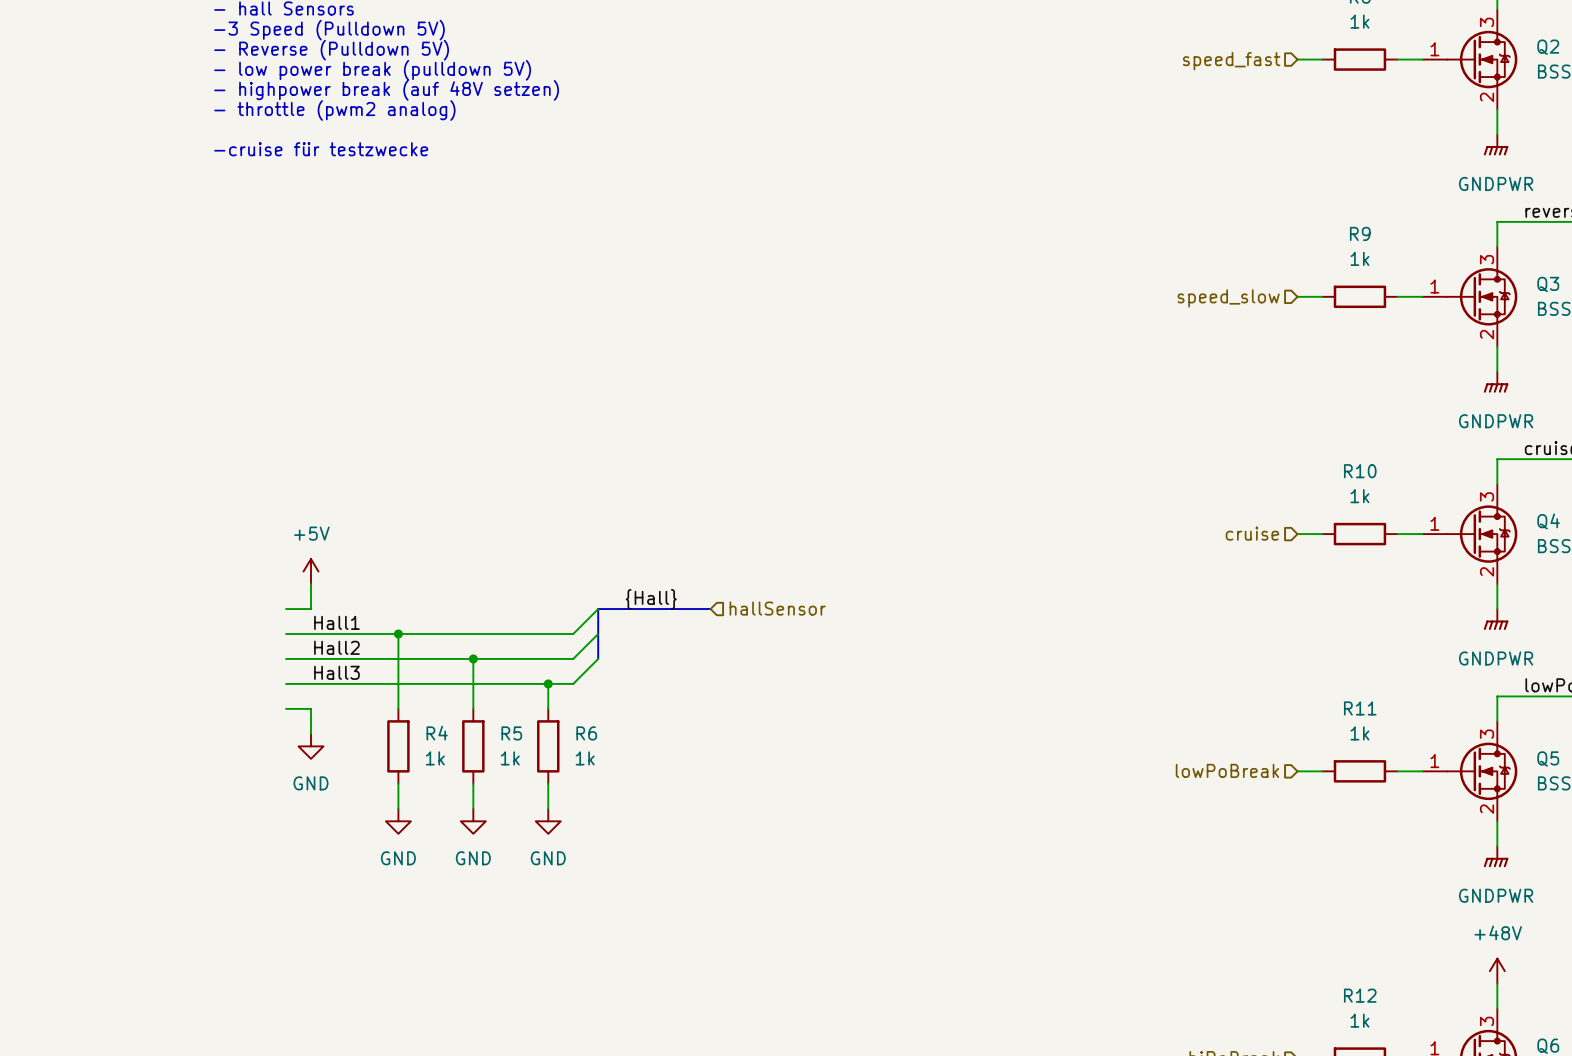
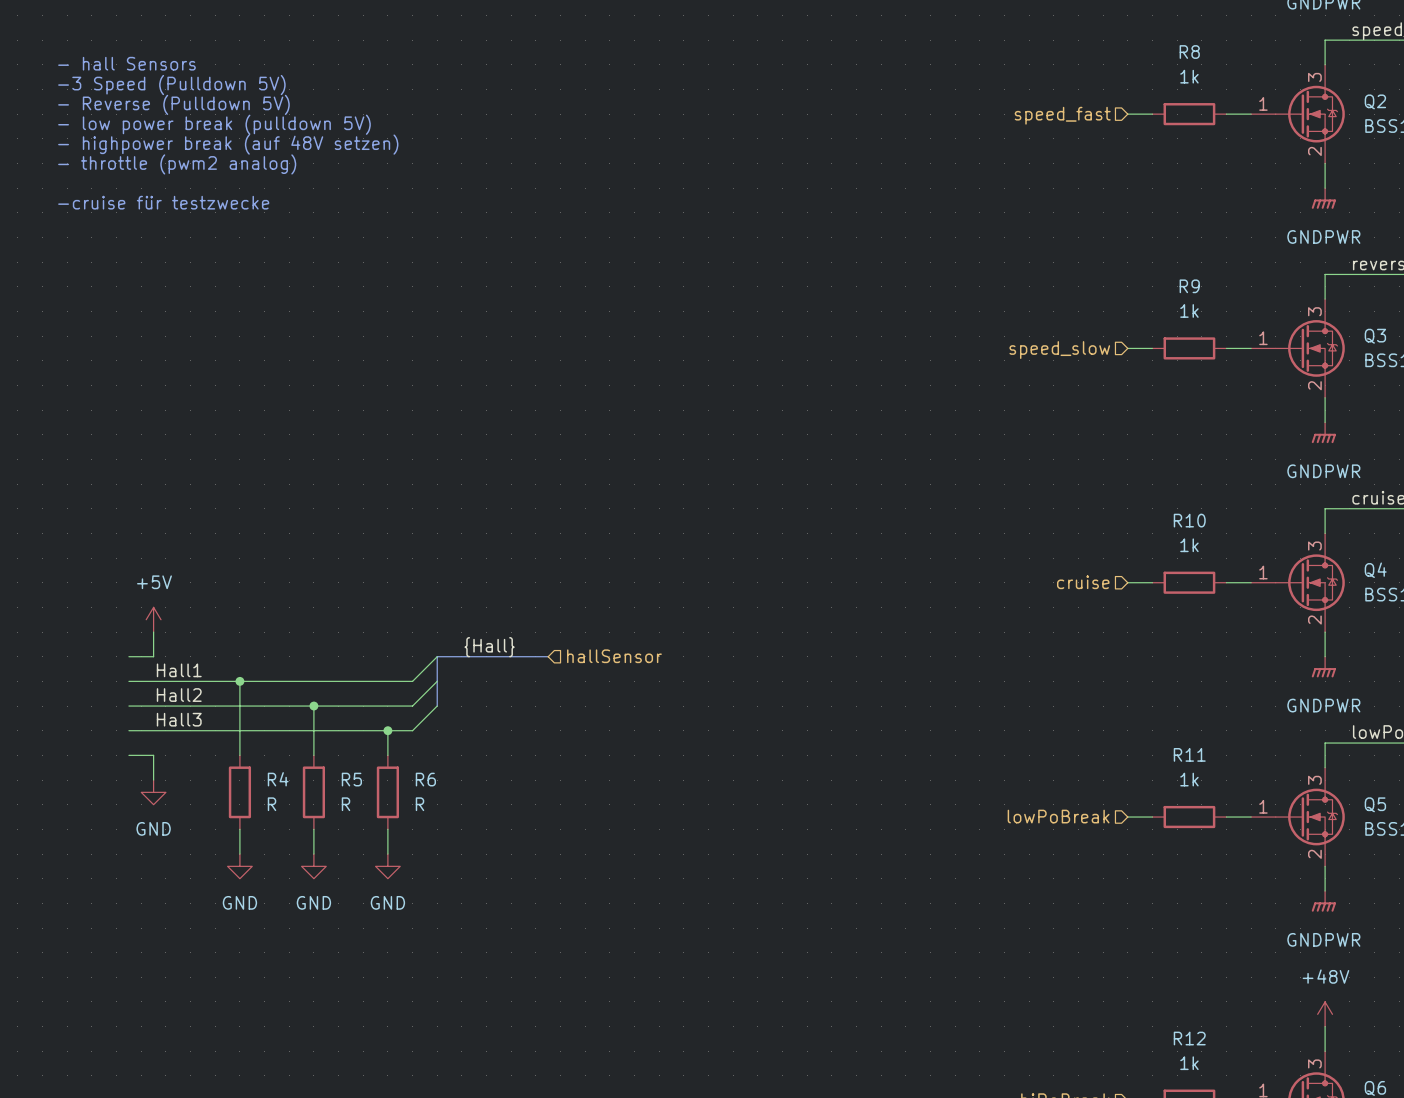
R4 value: 1k (435, 758) -> R (272, 804)
R5 value: 1k (510, 758) -> R (346, 804)
R6 value: 1k (585, 758) -> R (420, 804)

